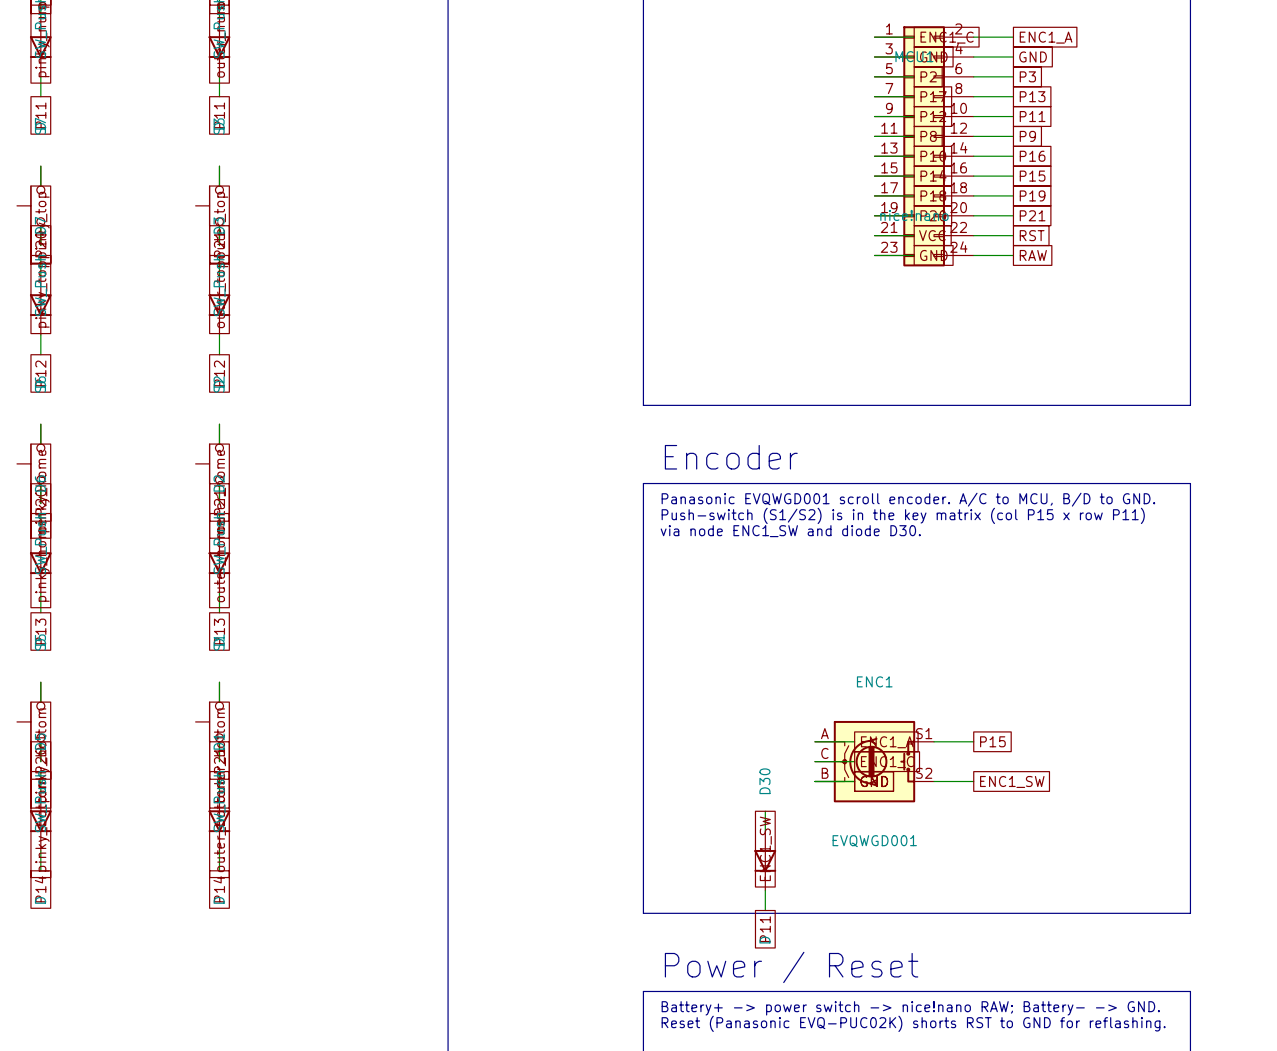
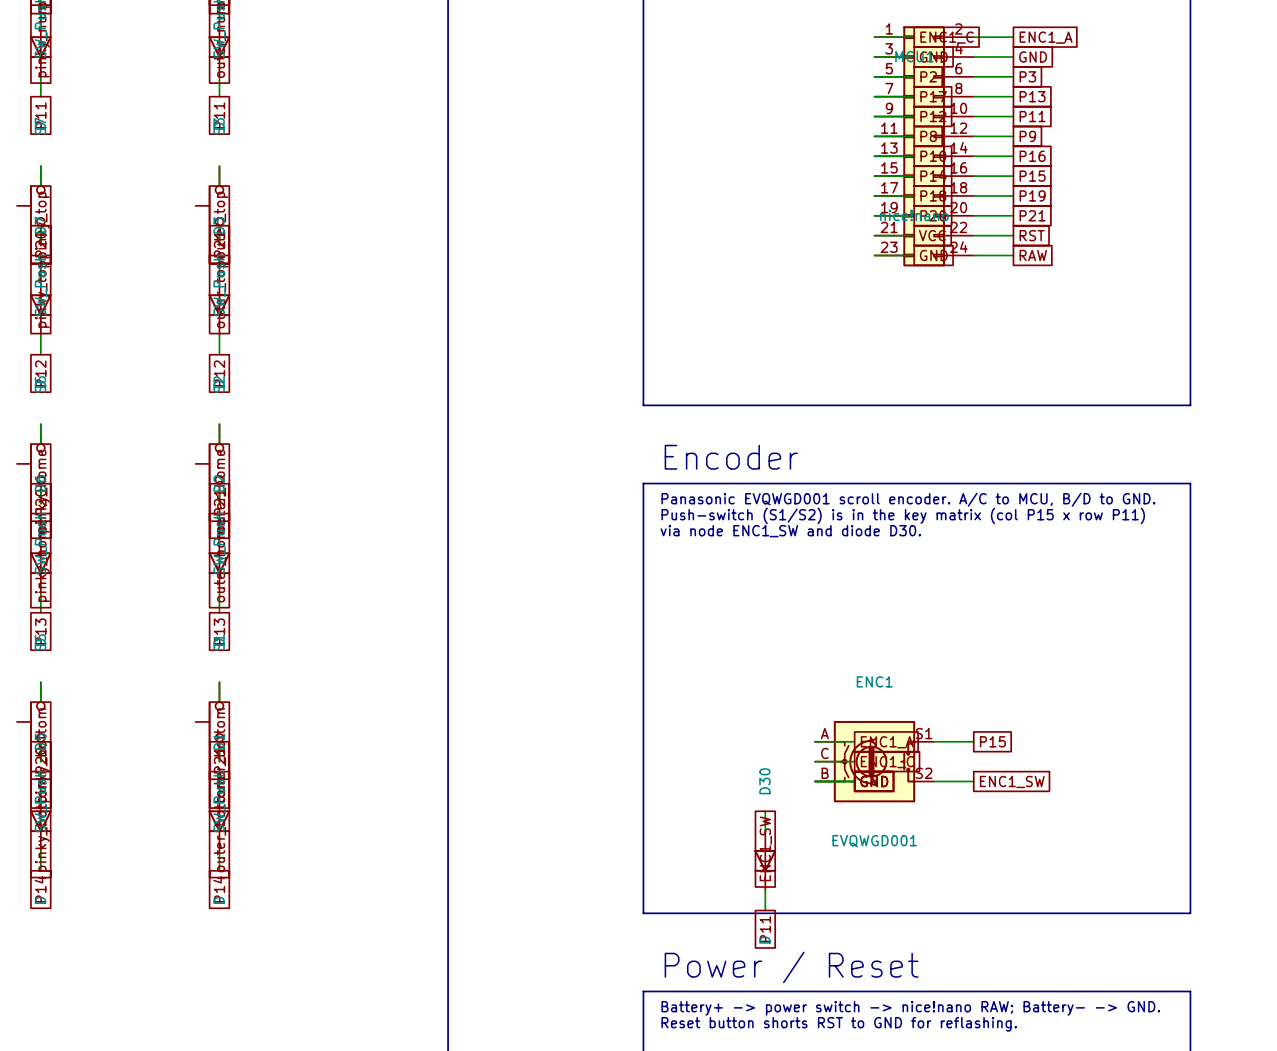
text: Reset (Panasonic EVQ-PUC02K) shorts RST to GND for reflashing. (913, 1023) -> Reset button shorts RST to GND for reflashing. (839, 1024)

